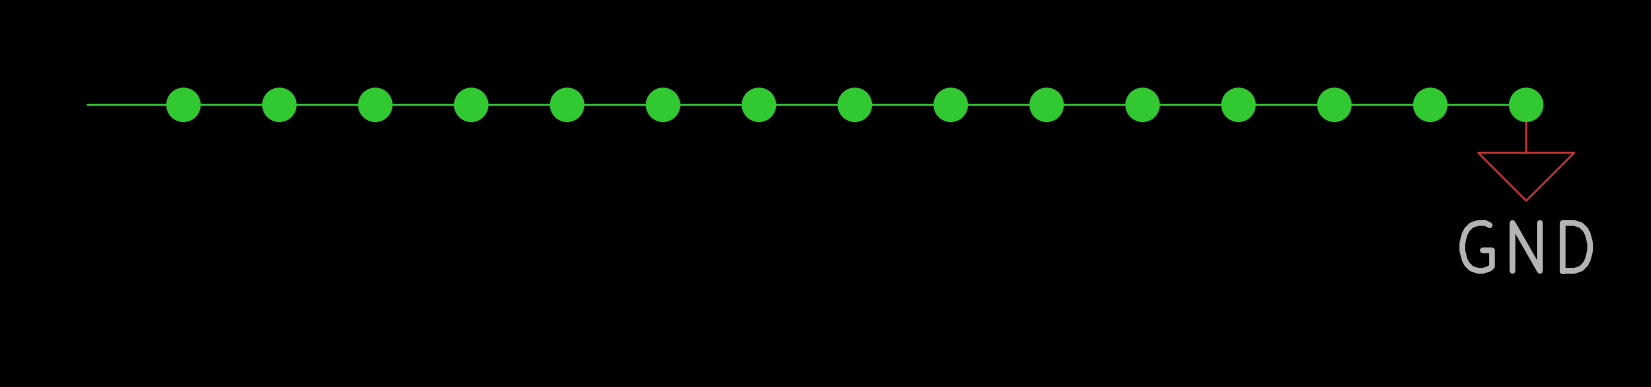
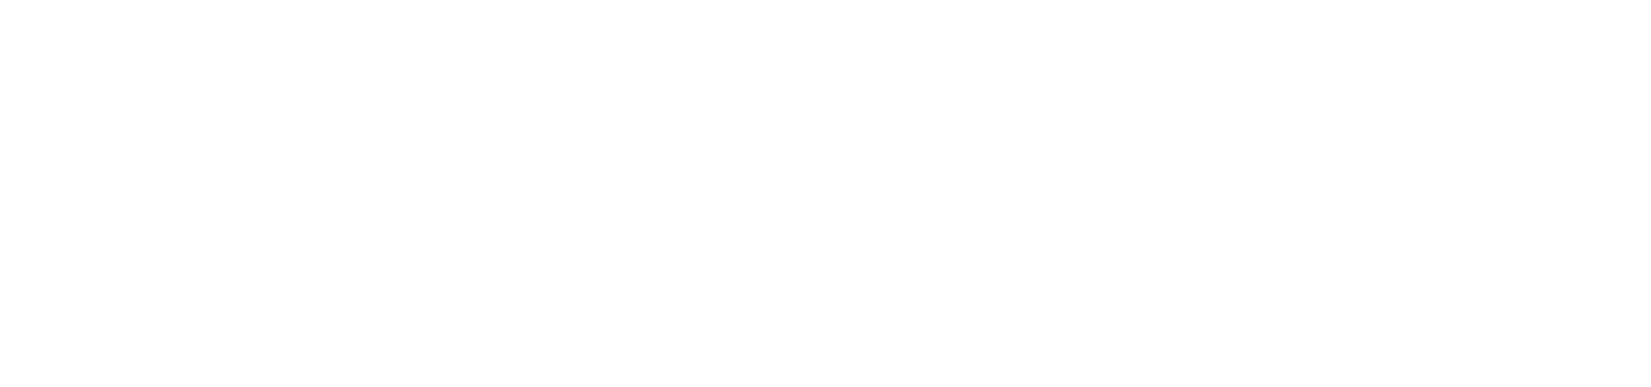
wire: (87, 104) (1526, 104) -> none
junction: (183, 104) -> none
junction: (279, 104) -> none
junction: (375, 104) -> none
junction: (471, 104) -> none
junction: (567, 104) -> none
junction: (663, 104) -> none
junction: (758, 104) -> none
junction: (854, 104) -> none
junction: (950, 104) -> none
junction: (1046, 104) -> none
junction: (1142, 104) -> none
junction: (1238, 104) -> none
junction: (1334, 104) -> none
junction: (1430, 104) -> none
junction: (1526, 104) -> none
power symbol: GND (1526, 152) -> none

